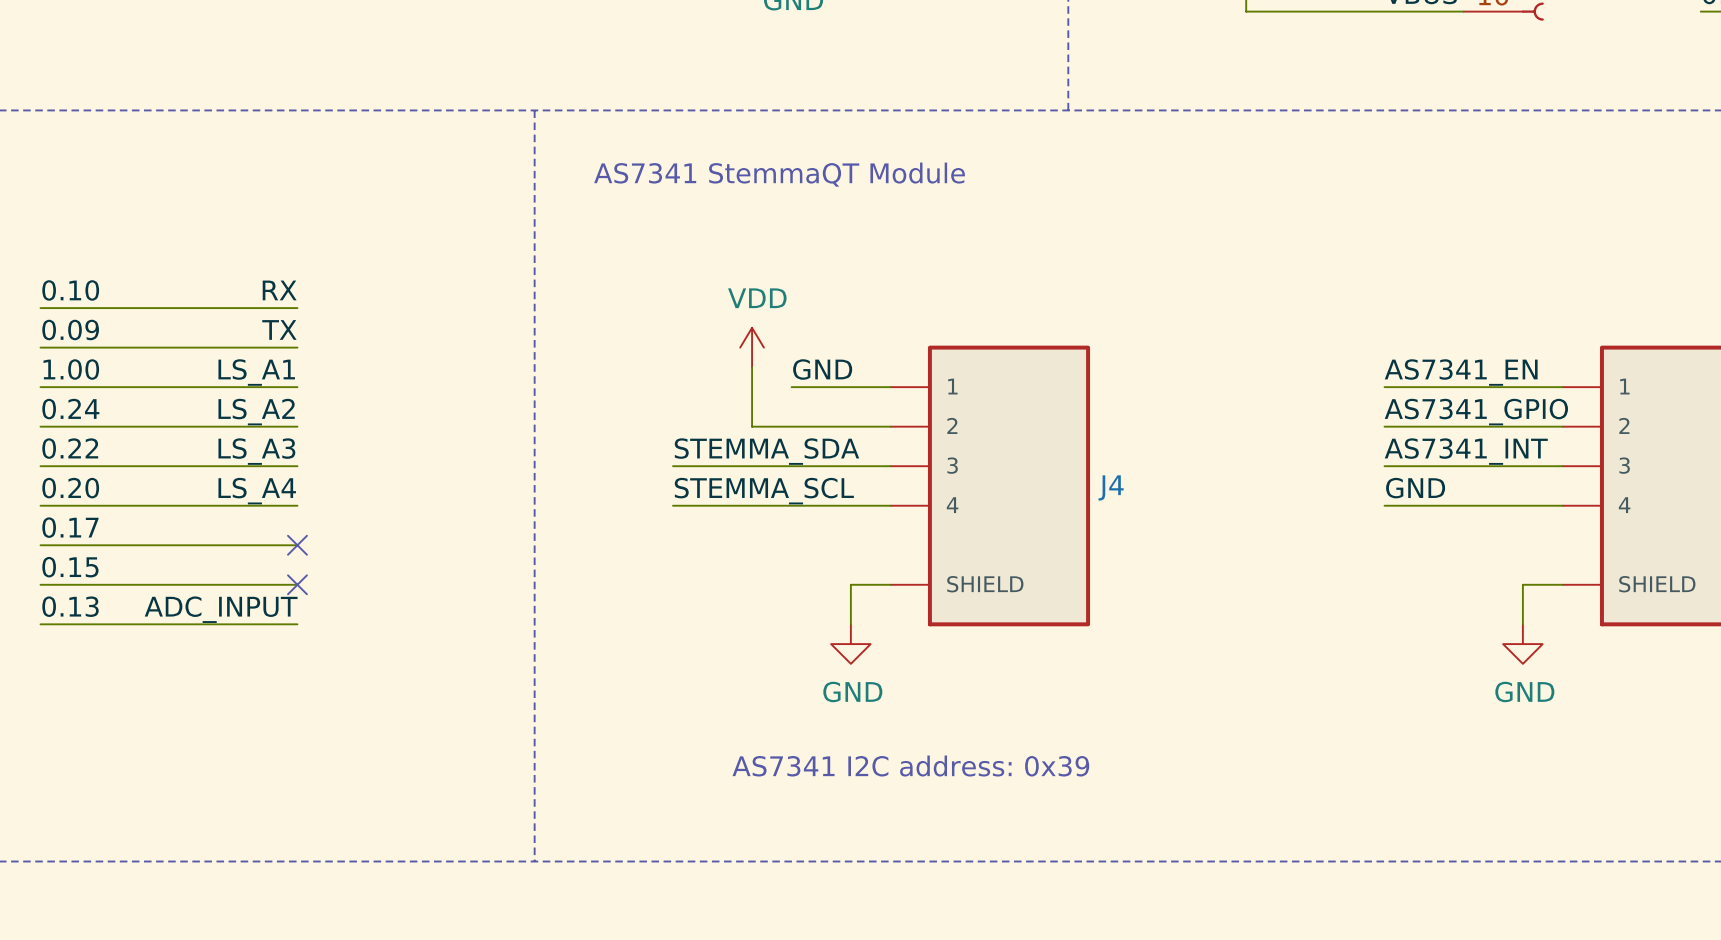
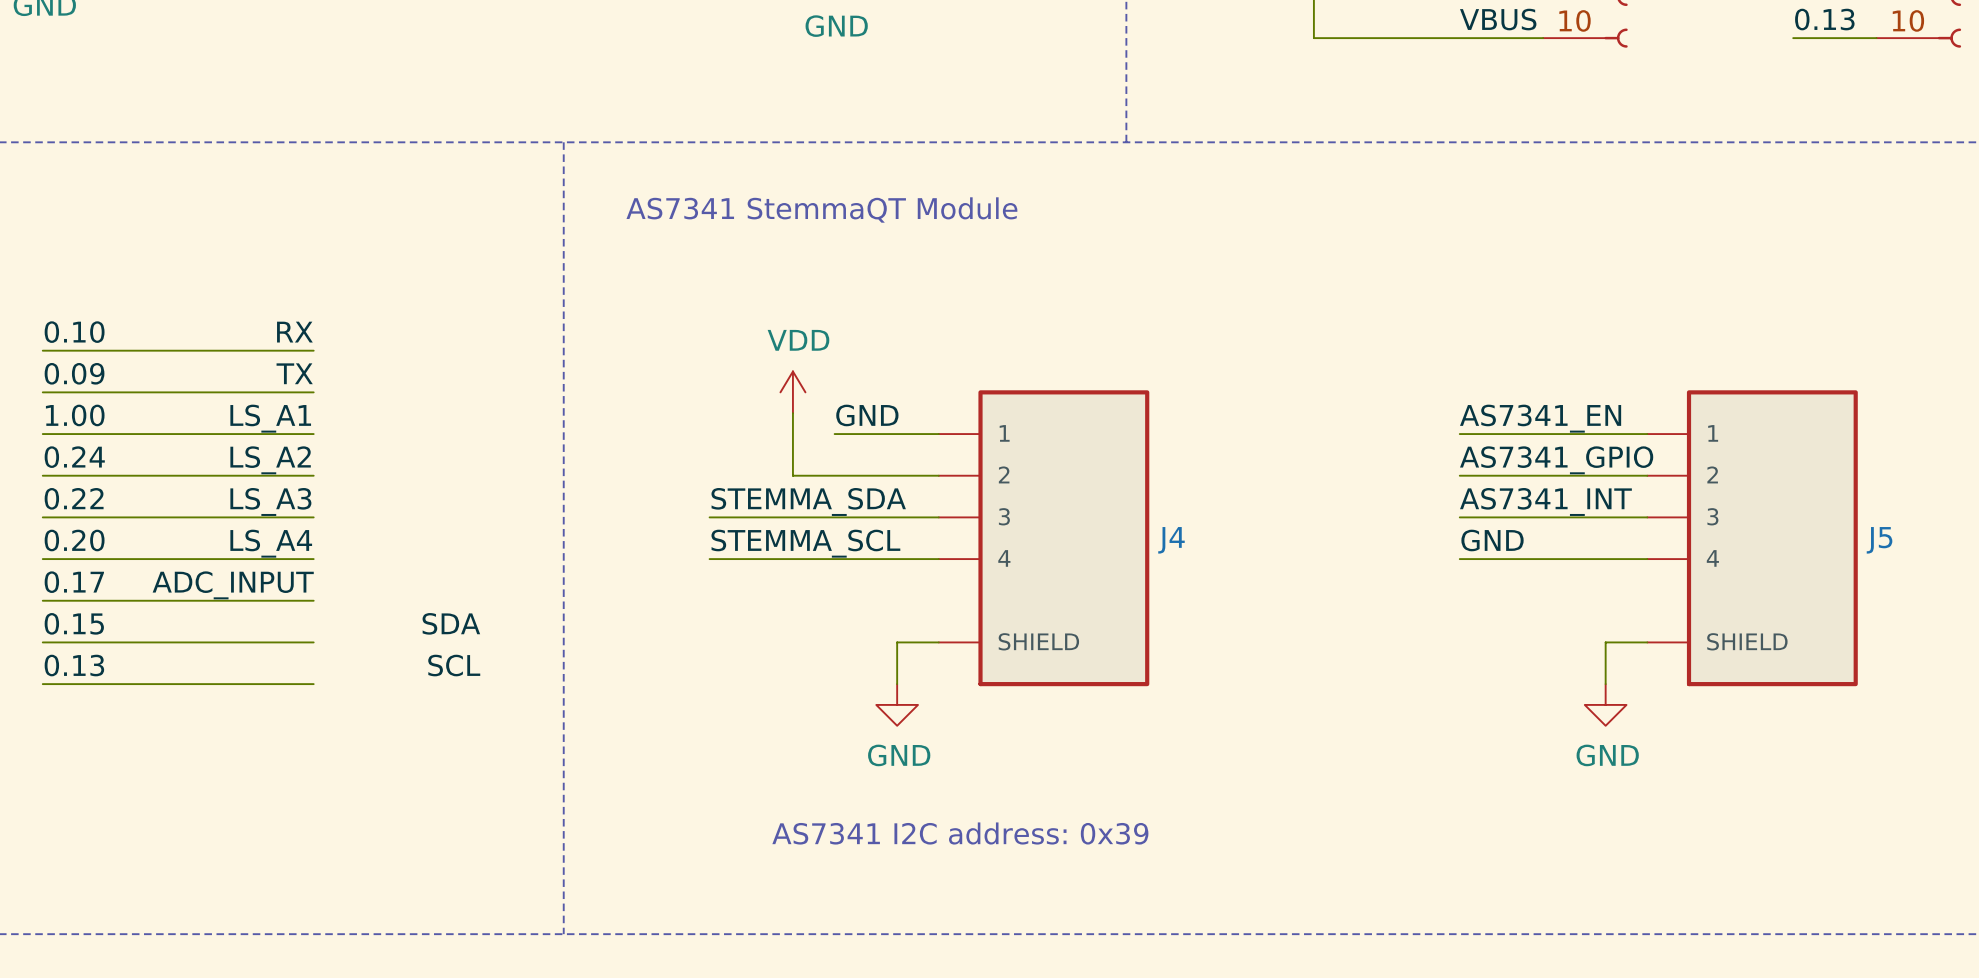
no-connect mark: (297, 545) -> none
label: none -> SDA (451, 623)
no-connect mark: (297, 584) -> none
label: none -> SCL (454, 665)
label position: ADC_INPUT (221, 609) -> ADC_INPUT (233, 585)

